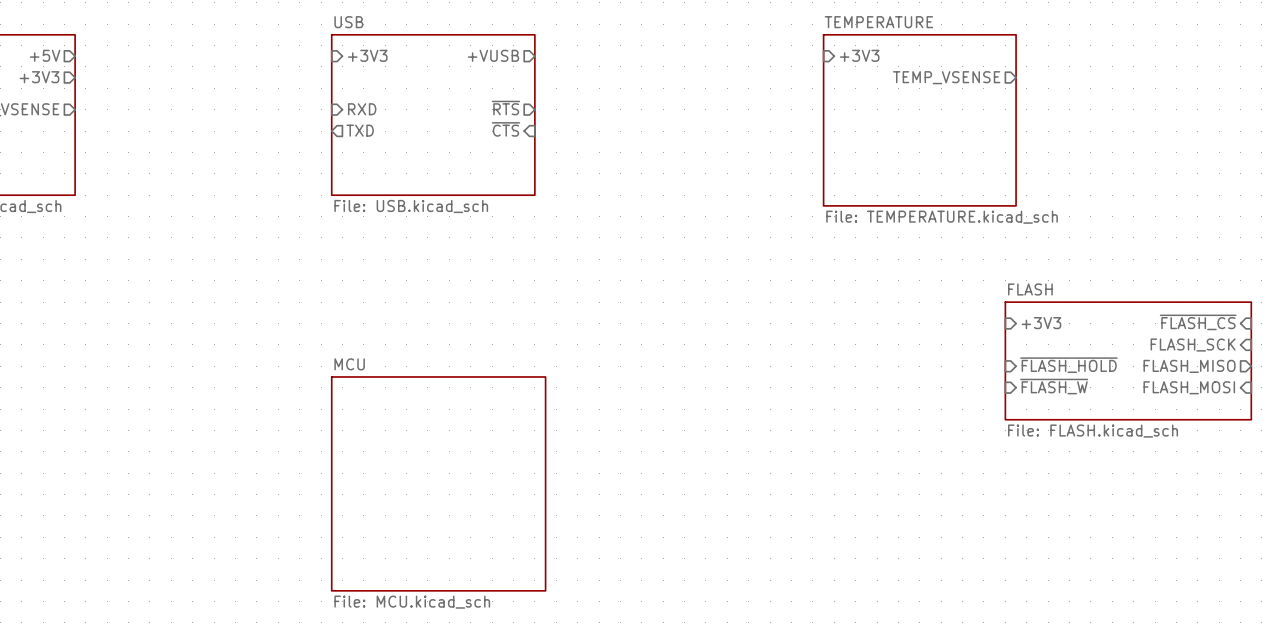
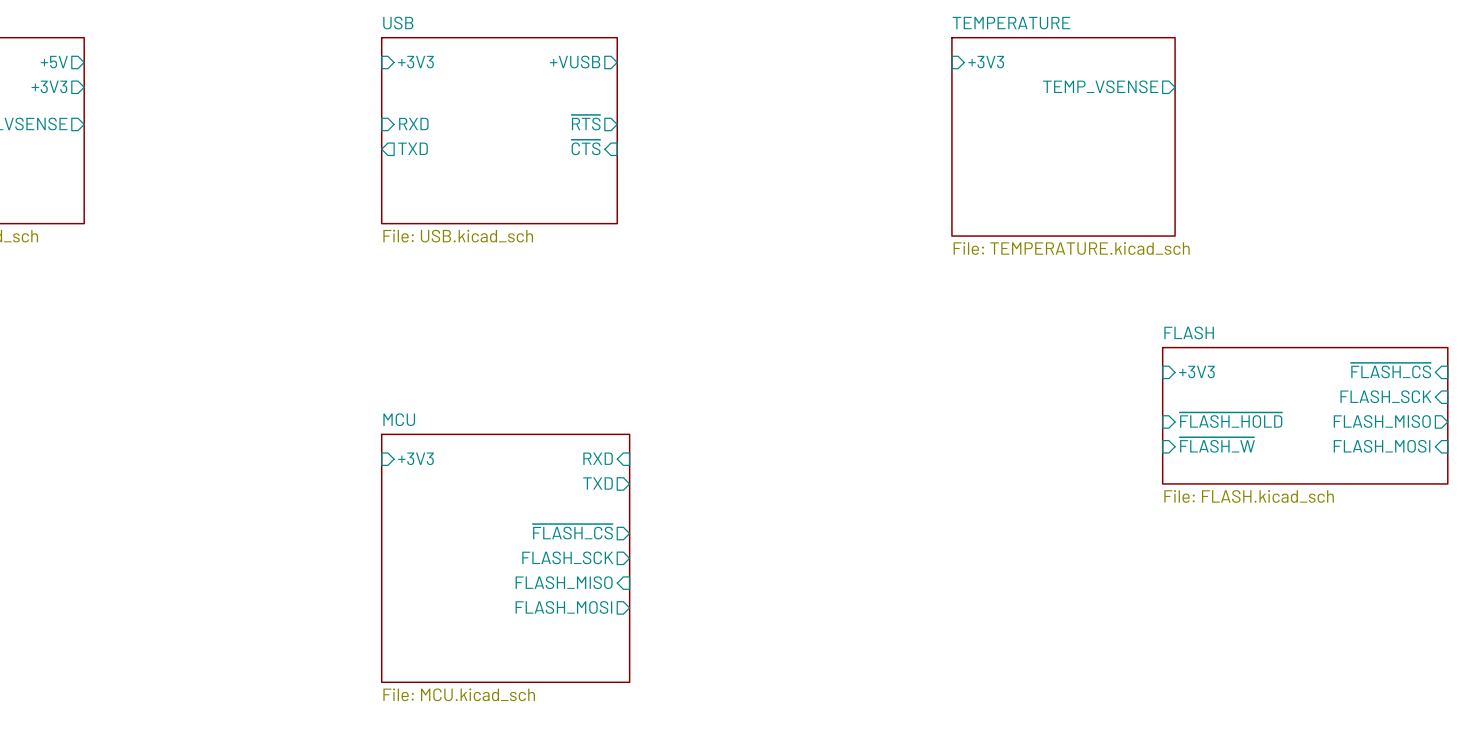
sheet pin: none -> +3V3 (415, 458)
sheet pin: none -> RXD (598, 458)
sheet pin: none -> TXD (598, 483)
sheet pin: none -> ~{FLASH_CS} (572, 531)
sheet pin: none -> FLASH_SCK (567, 557)
sheet pin: none -> FLASH_MISO (564, 582)
sheet pin: none -> FLASH_MOSI (563, 607)

